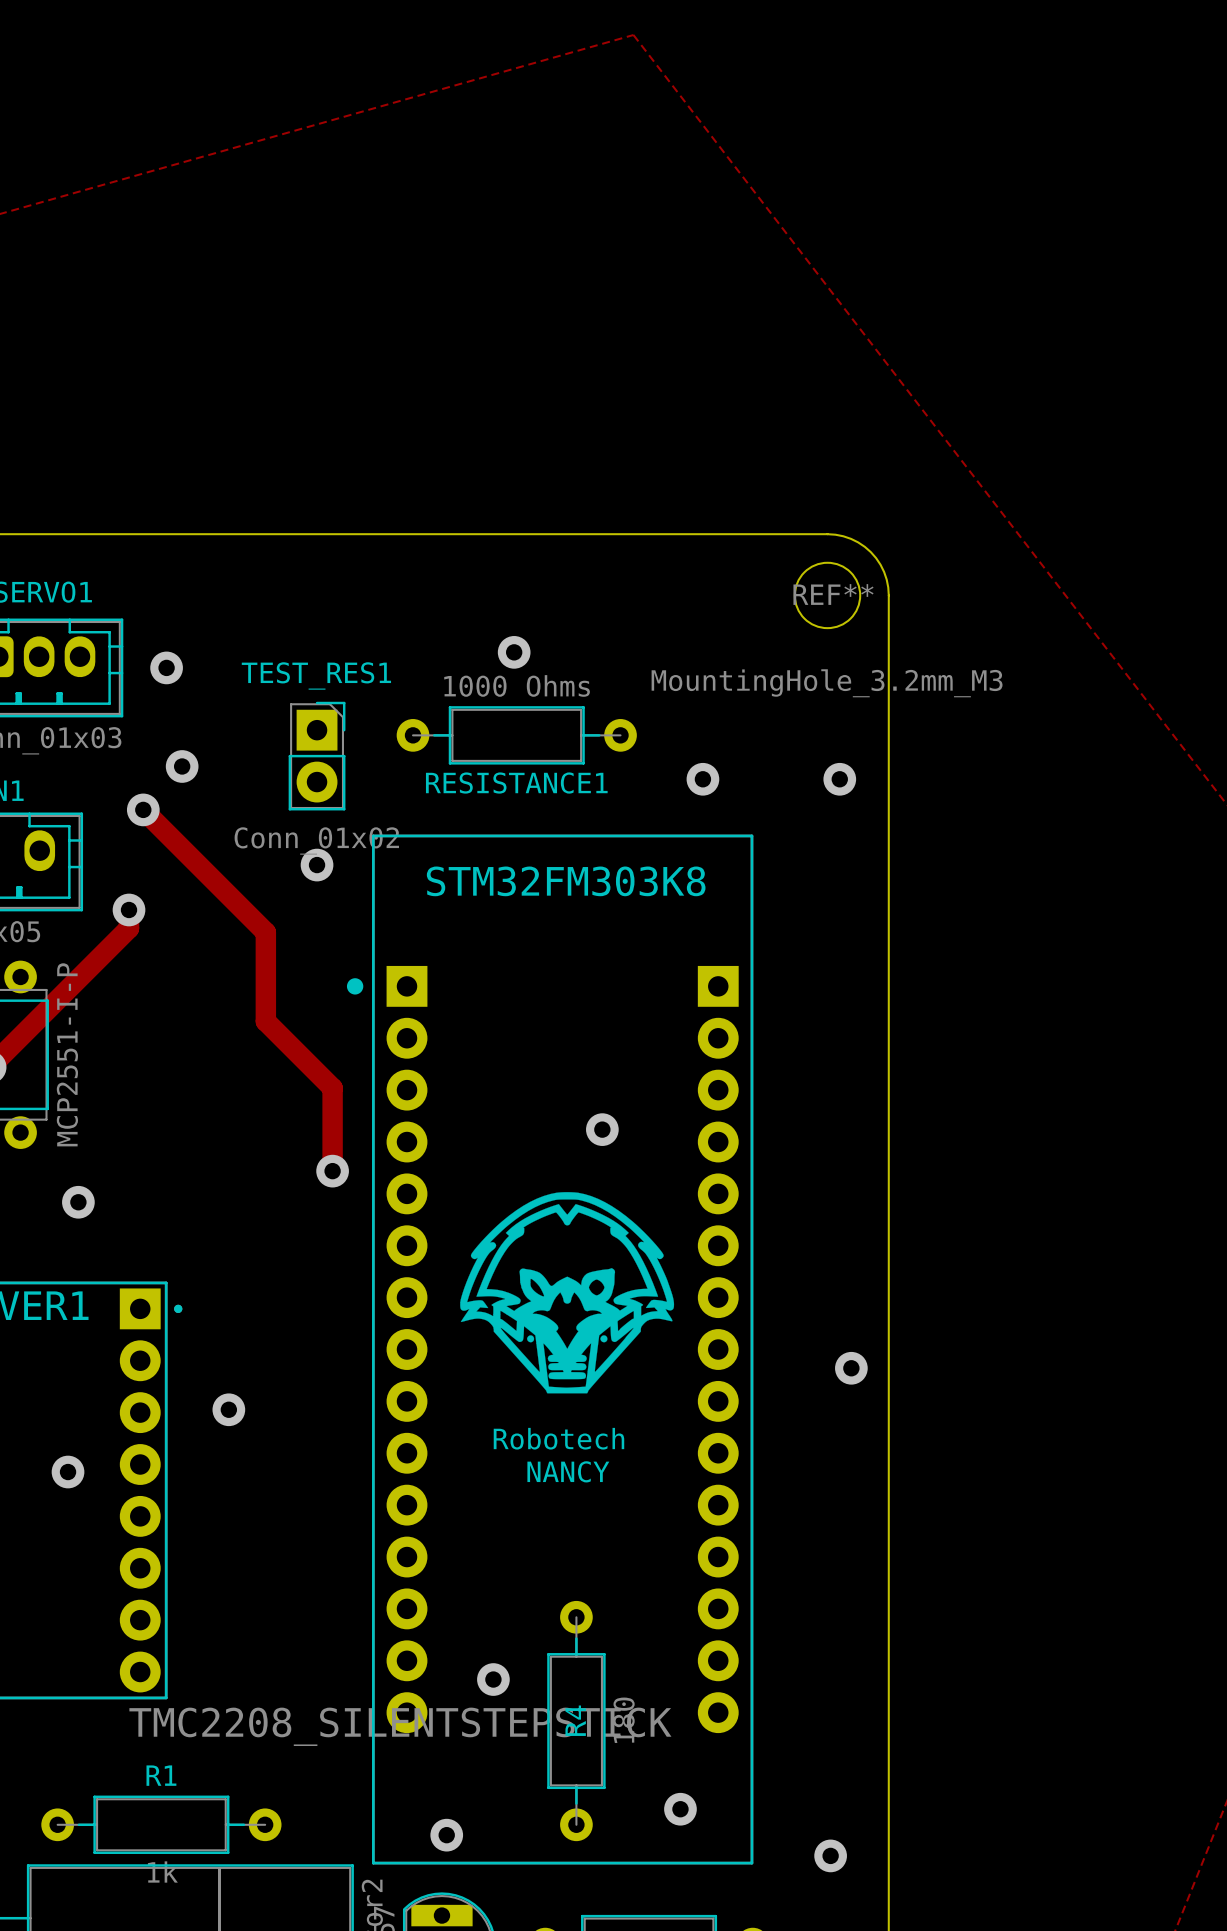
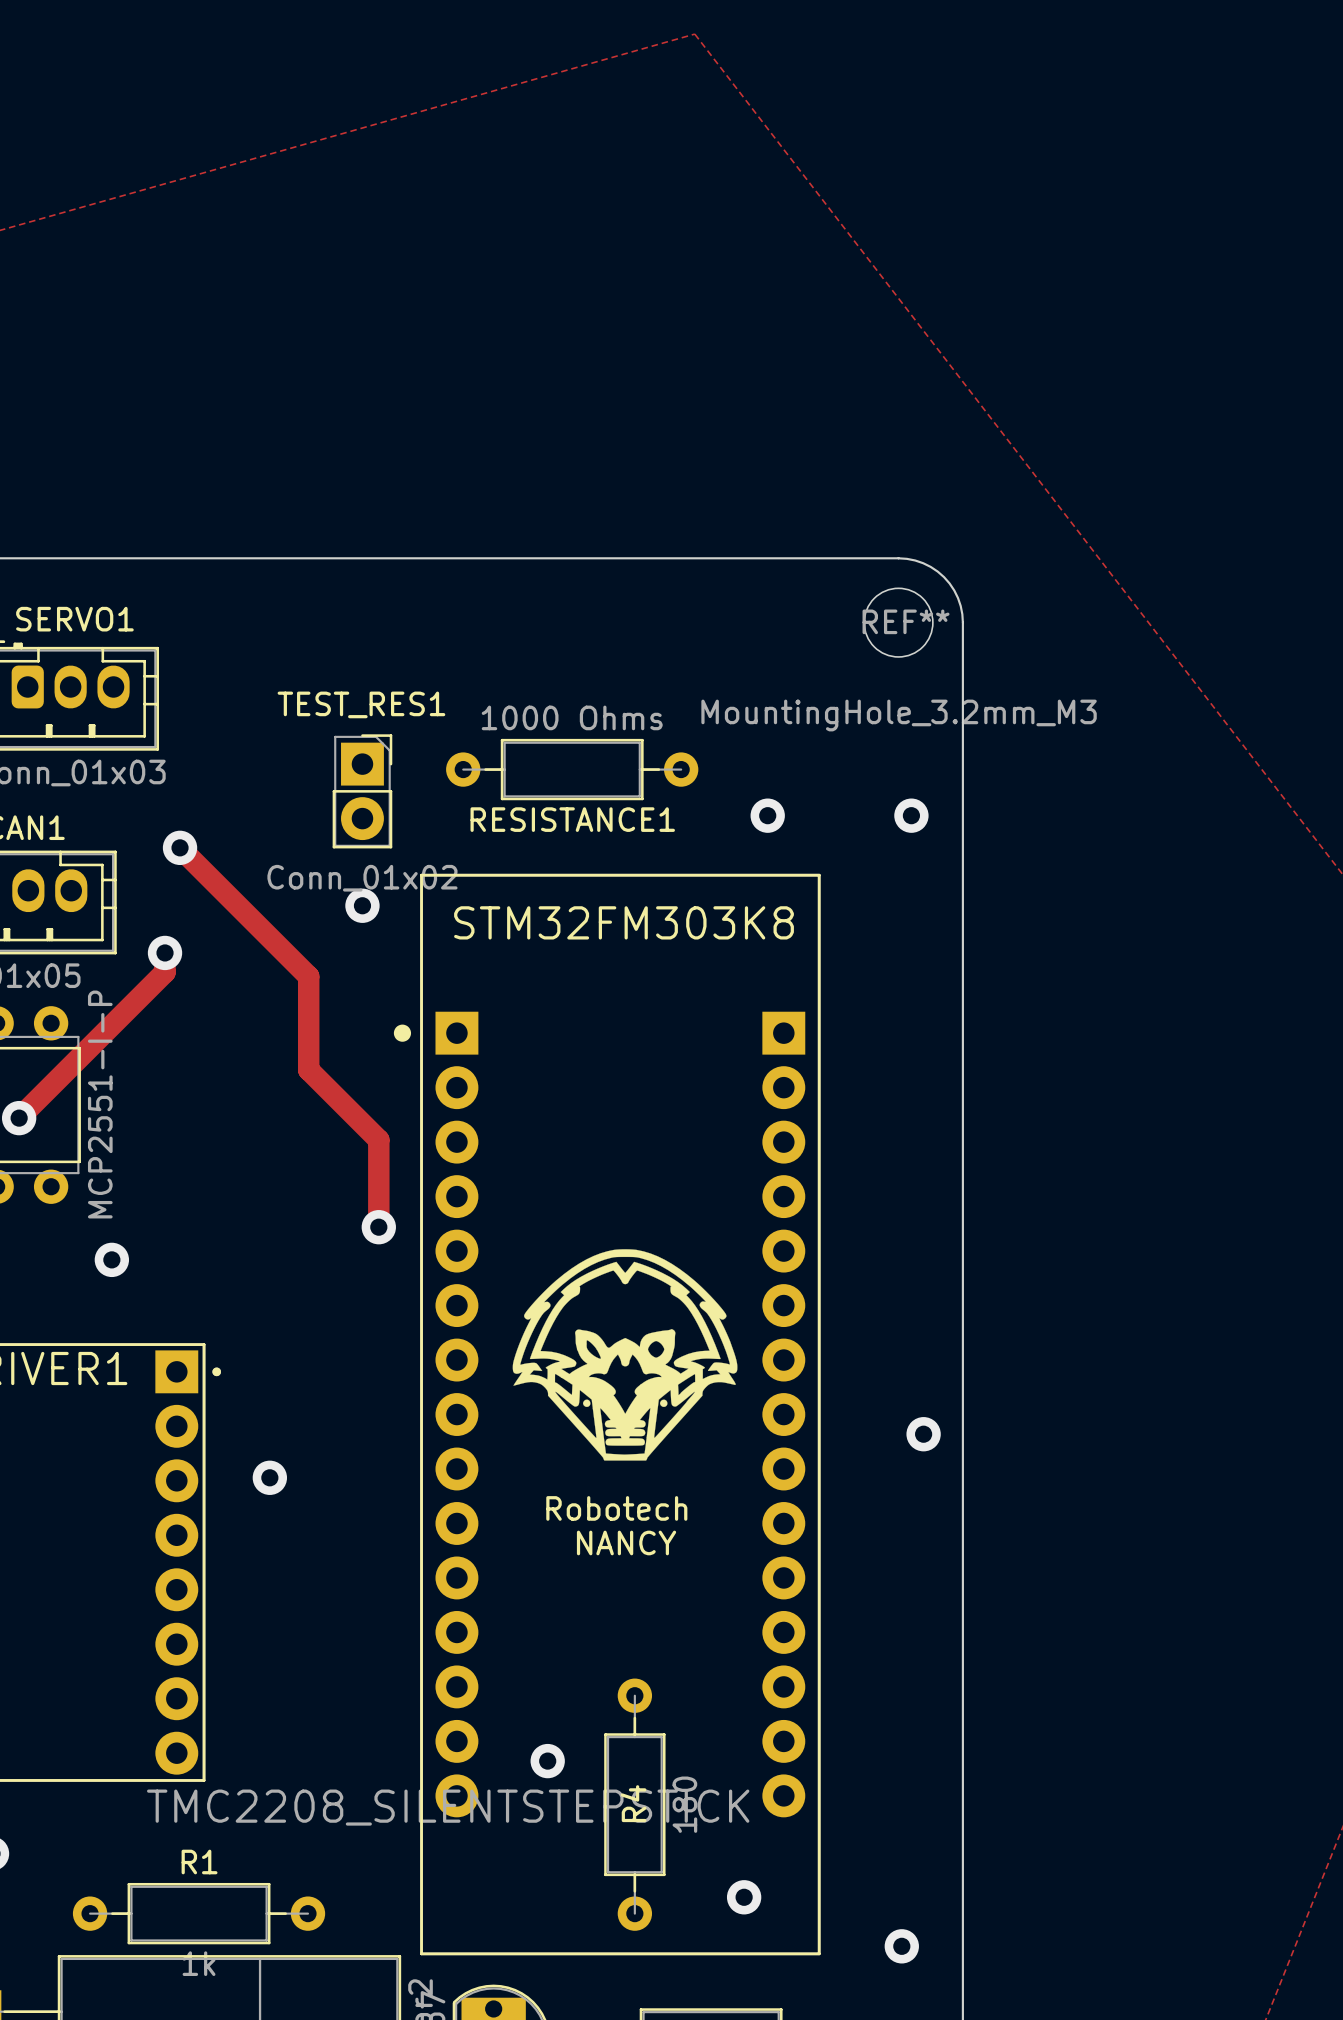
via: (514, 652) -> none
via: (166, 667) -> none
via: (182, 766) -> none
via: (602, 1129) -> none
via: (68, 1472) -> none
via: (446, 1835) -> none

